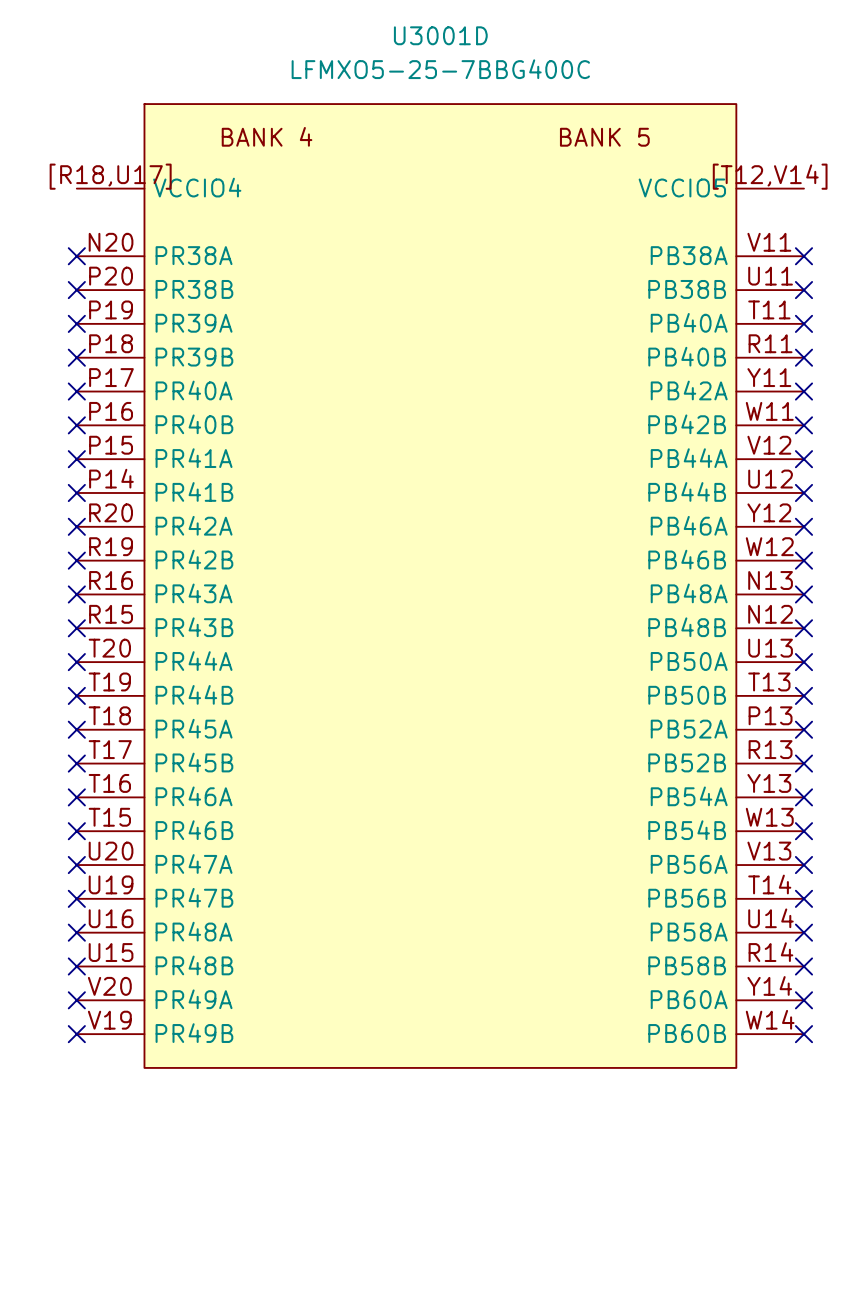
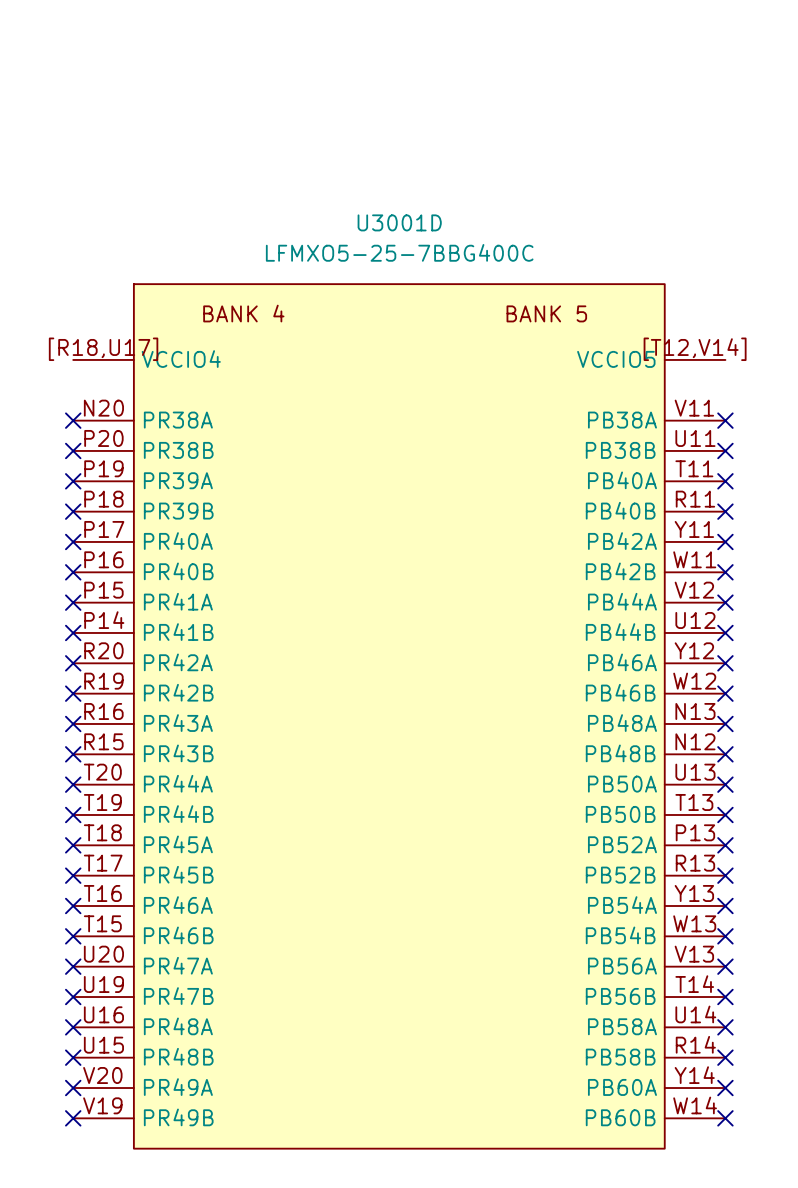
no-connect mark: (76, 256) -> none
no-connect mark: (803, 256) -> none
no-connect mark: (76, 290) -> none
no-connect mark: (803, 290) -> none
no-connect mark: (76, 323) -> none
no-connect mark: (803, 323) -> none
no-connect mark: (76, 357) -> none
no-connect mark: (803, 357) -> none
no-connect mark: (76, 391) -> none
no-connect mark: (803, 391) -> none
no-connect mark: (76, 425) -> none
no-connect mark: (803, 425) -> none
U3001D position: (440, 586) -> (399, 716)
no-connect mark: none -> (73, 966)
no-connect mark: none -> (725, 966)
no-connect mark: none -> (73, 997)
no-connect mark: none -> (725, 997)
no-connect mark: none -> (73, 1027)
no-connect mark: none -> (725, 1027)
no-connect mark: none -> (73, 1057)
no-connect mark: none -> (725, 1057)
no-connect mark: none -> (73, 1088)
no-connect mark: none -> (725, 1088)
no-connect mark: none -> (73, 1118)
no-connect mark: none -> (725, 1118)

